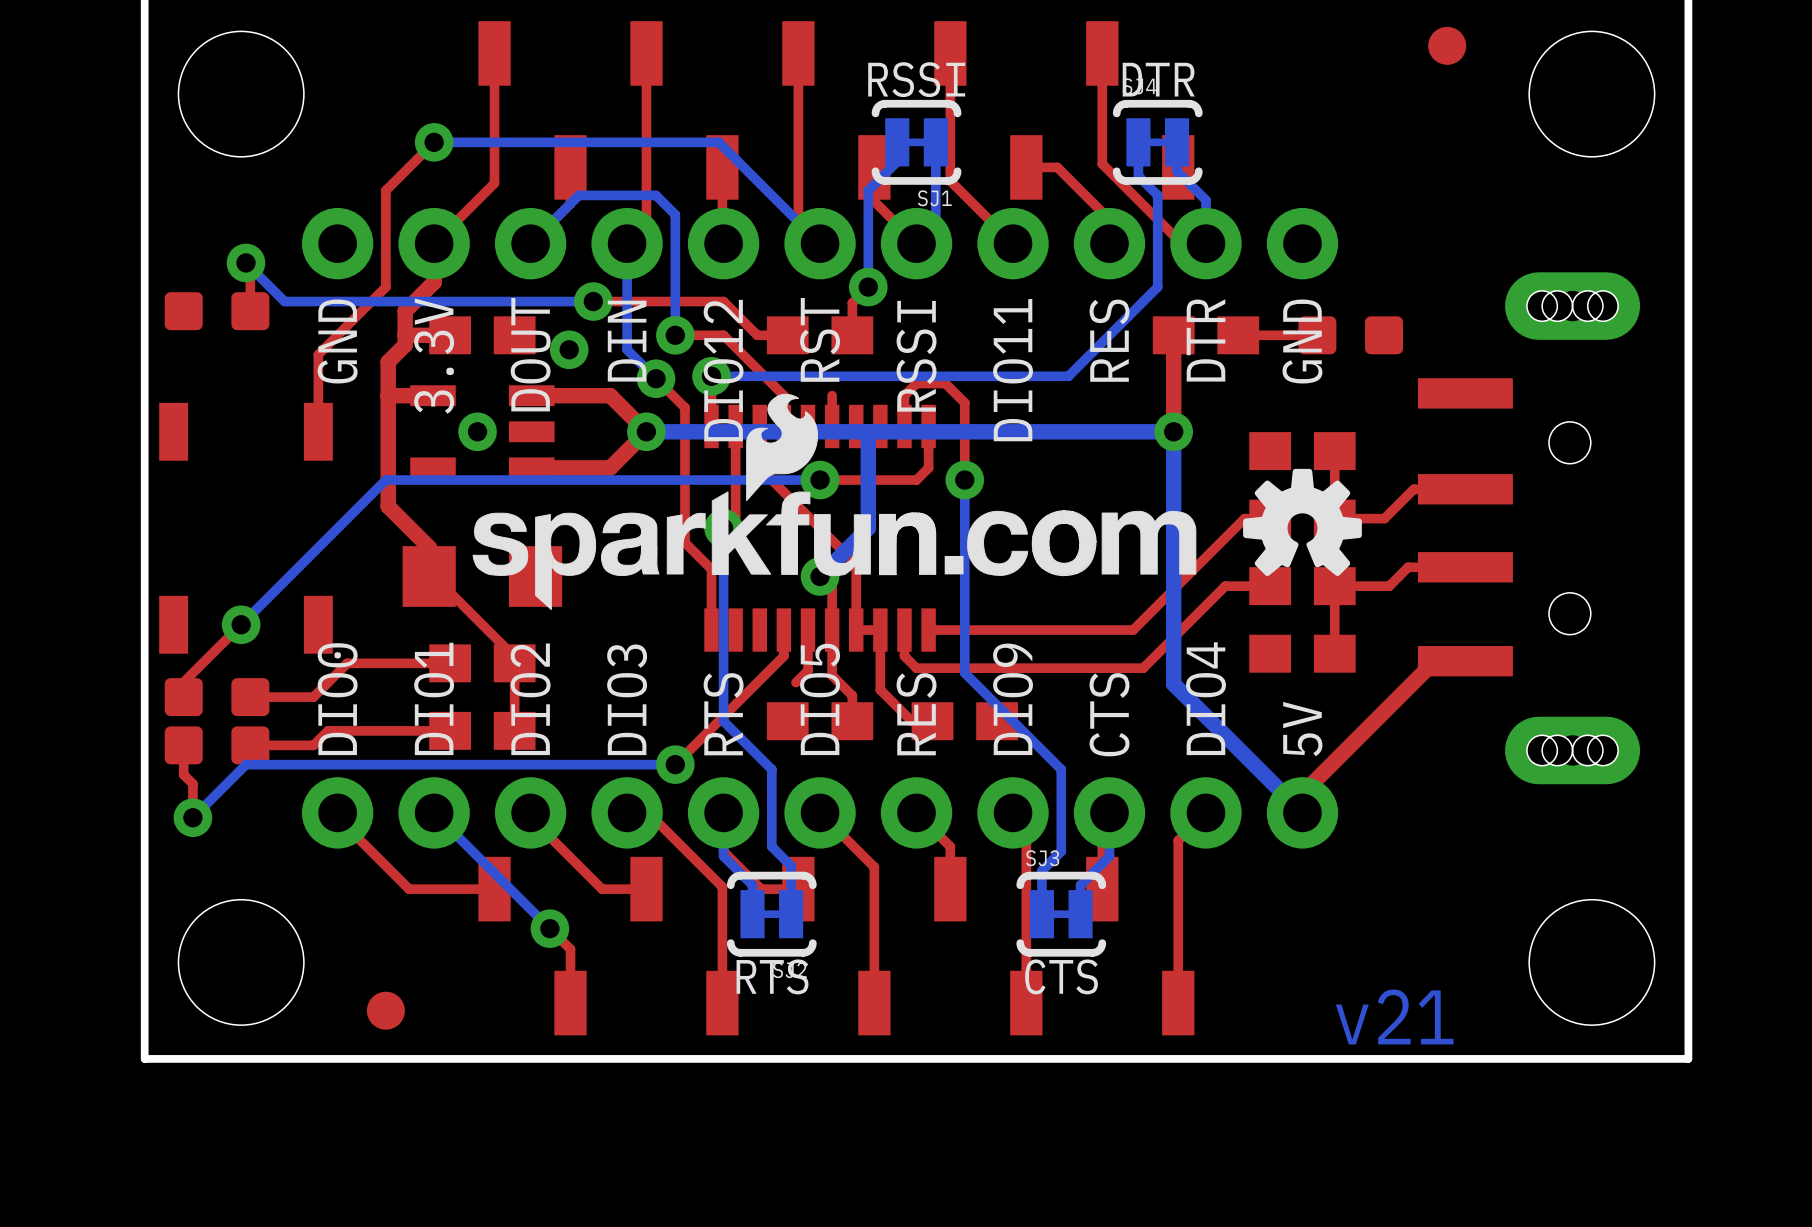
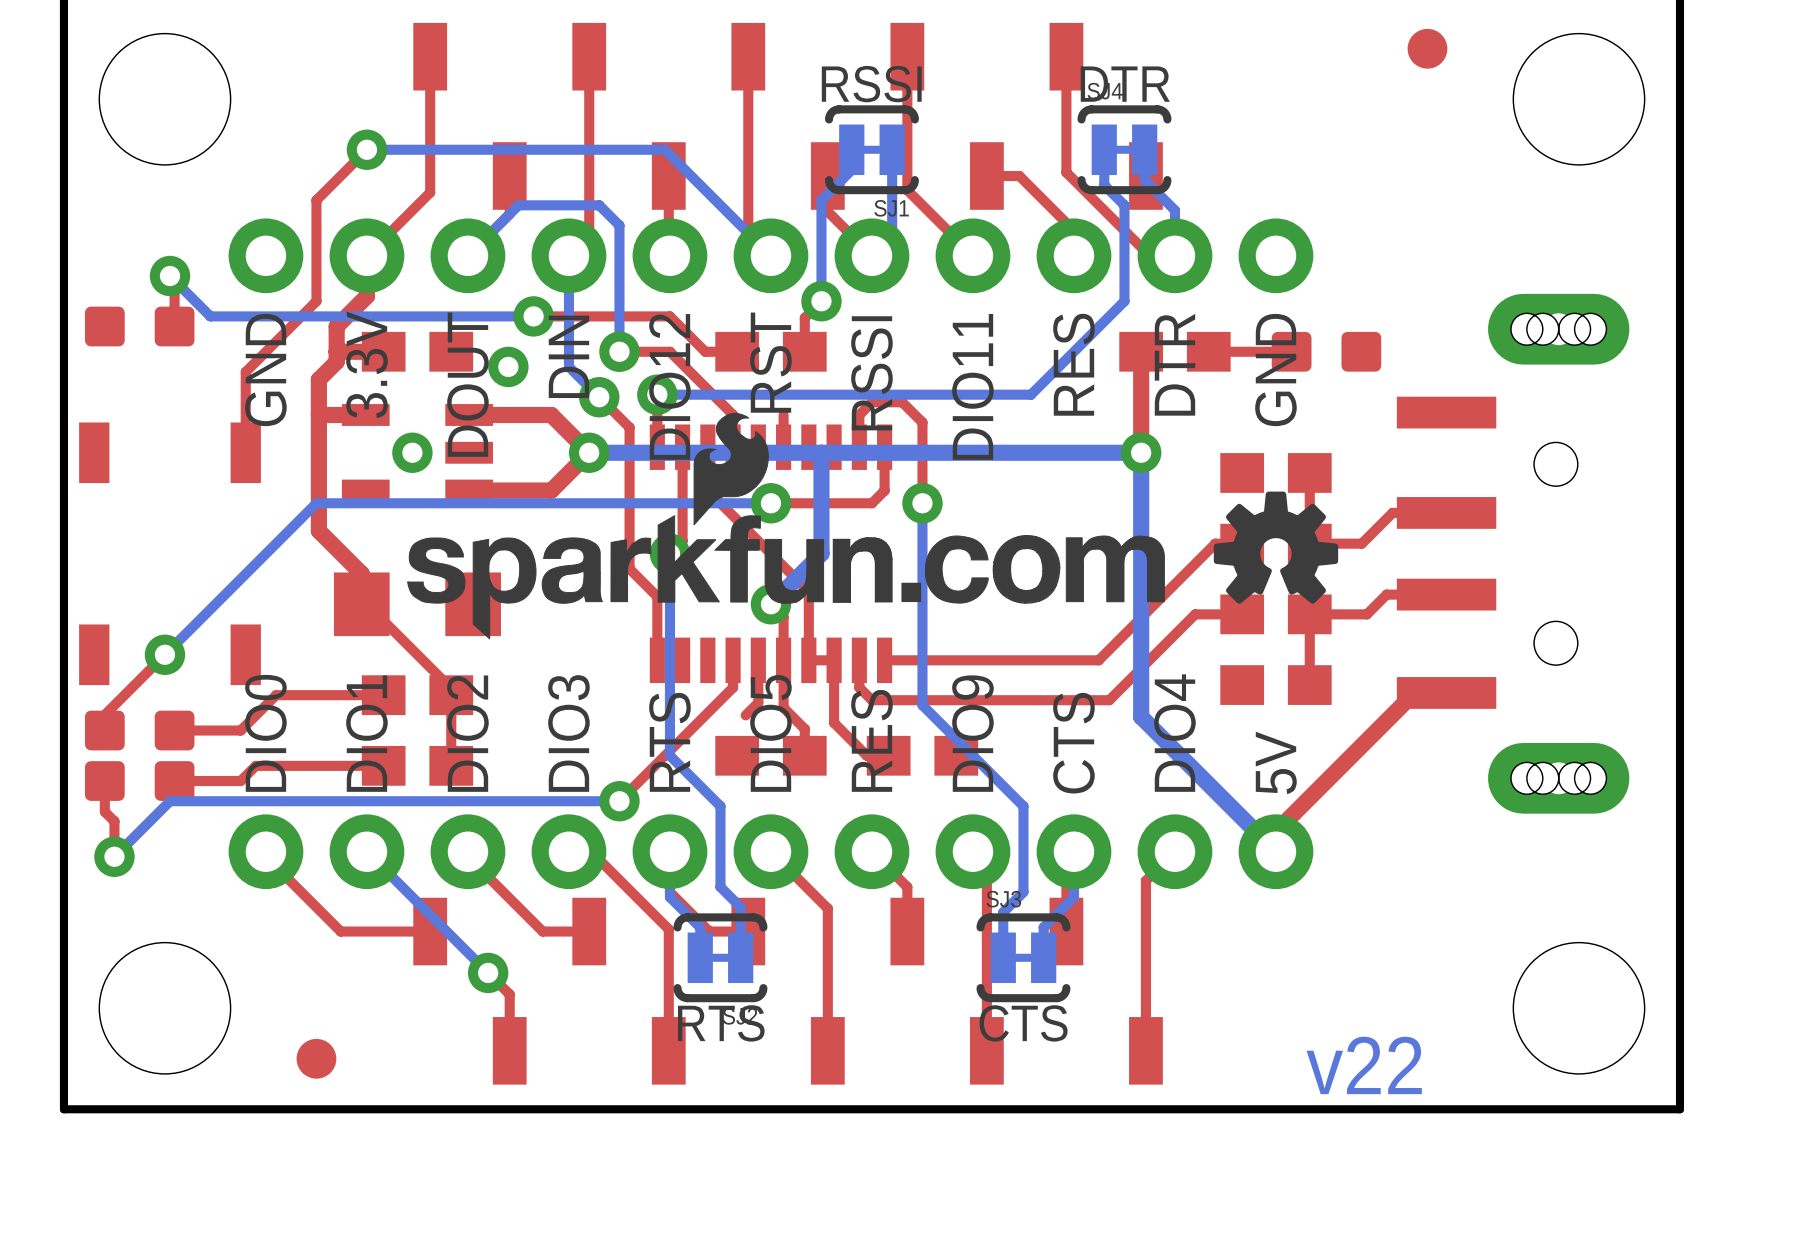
part footprint: [1417, 272, 1641, 785] -> [1396, 293, 1630, 814]
text: v21 (1394, 1016) -> v22 (1364, 1065)

